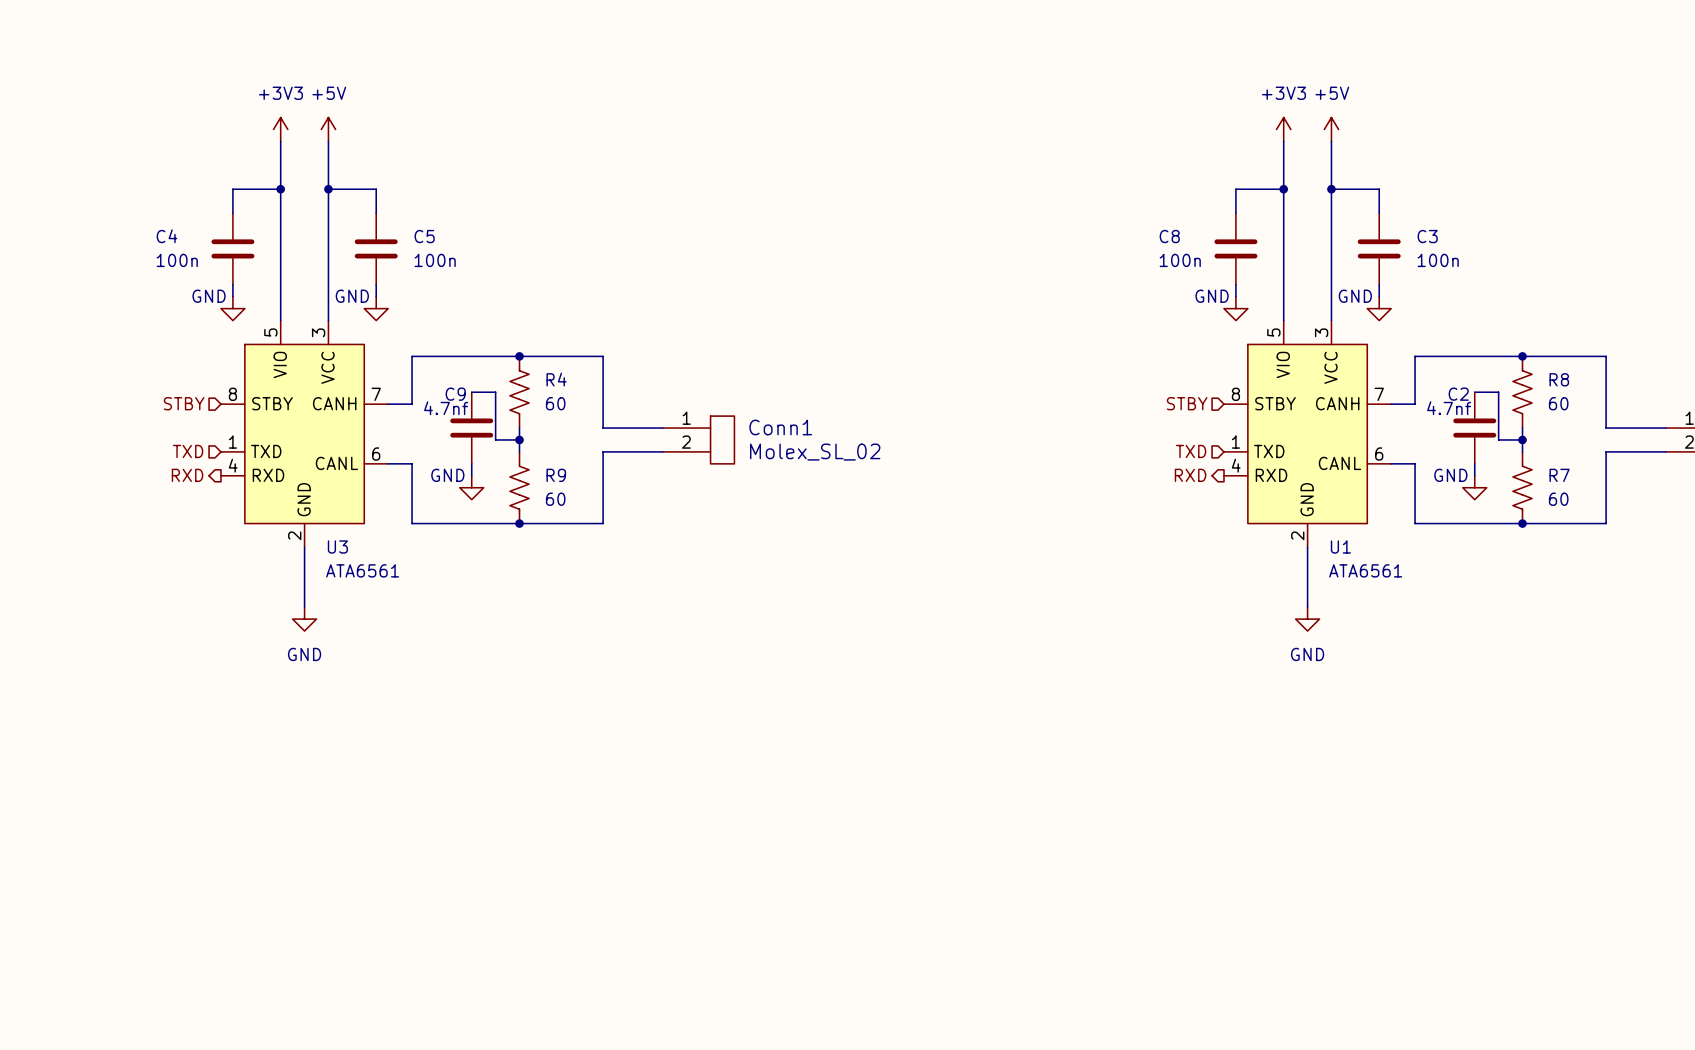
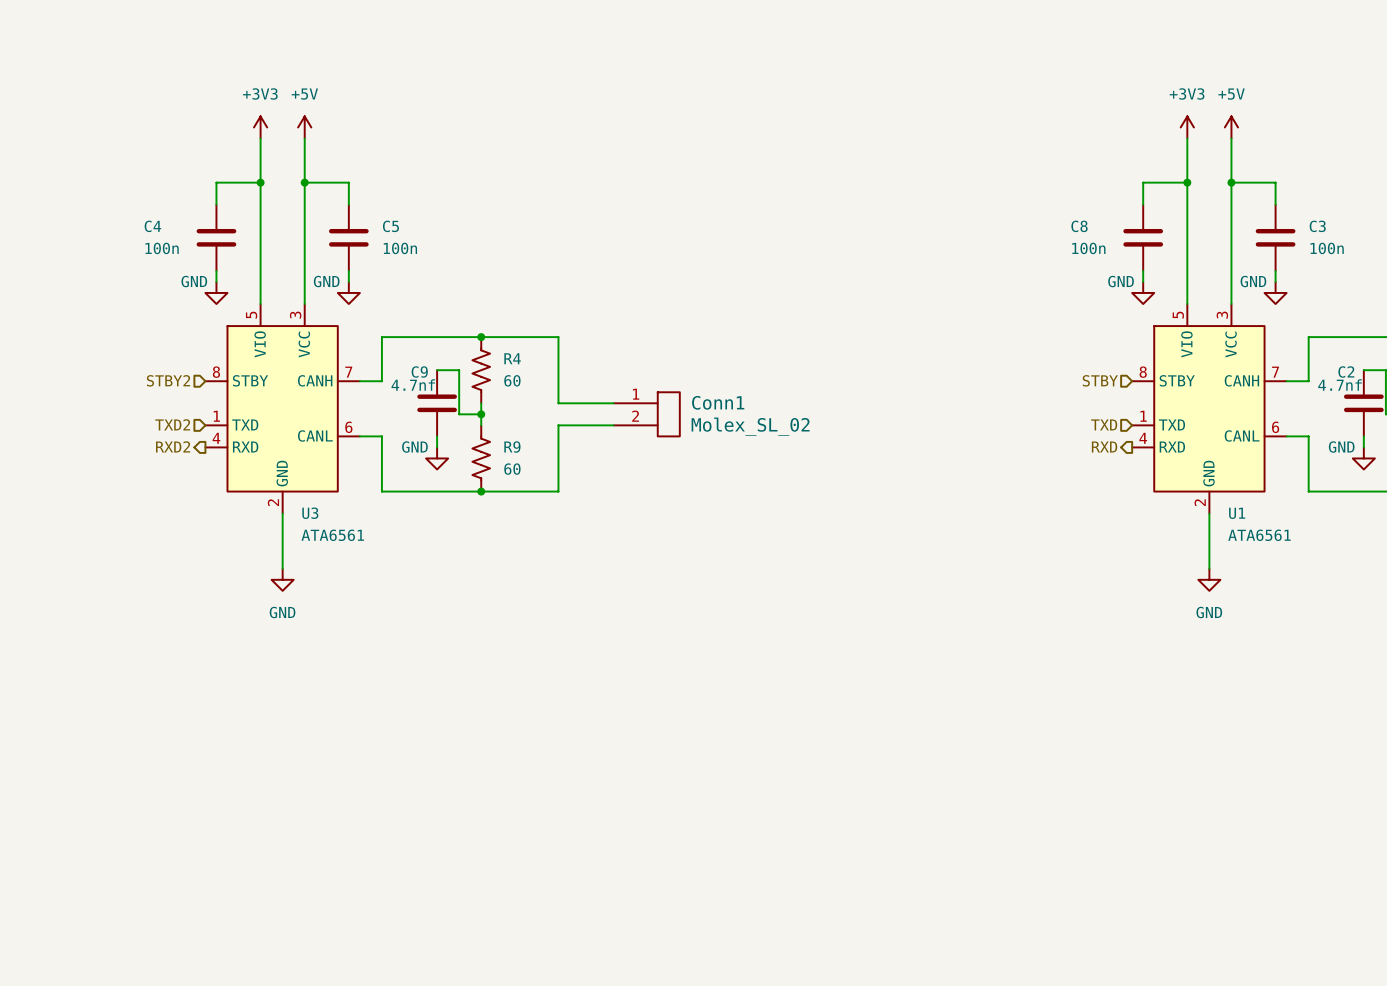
hierarchical label: STBY (184, 403) -> STBY2 (168, 380)
hierarchical label: TXD (188, 451) -> TXD2 (172, 424)
hierarchical label: RXD (187, 475) -> RXD2 (173, 446)

